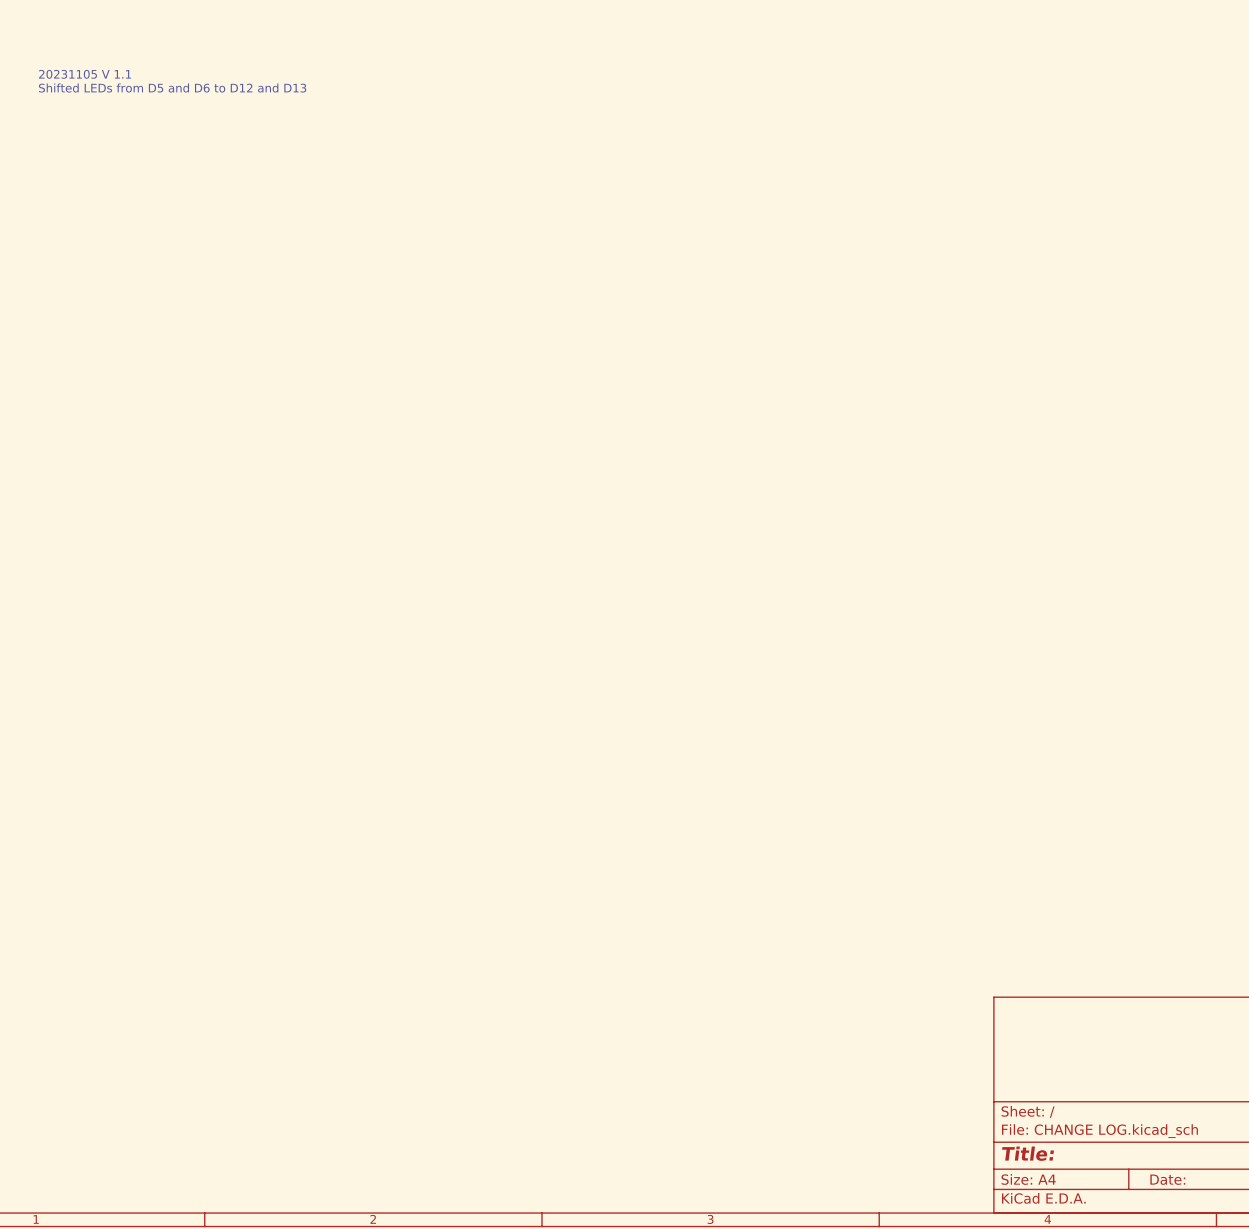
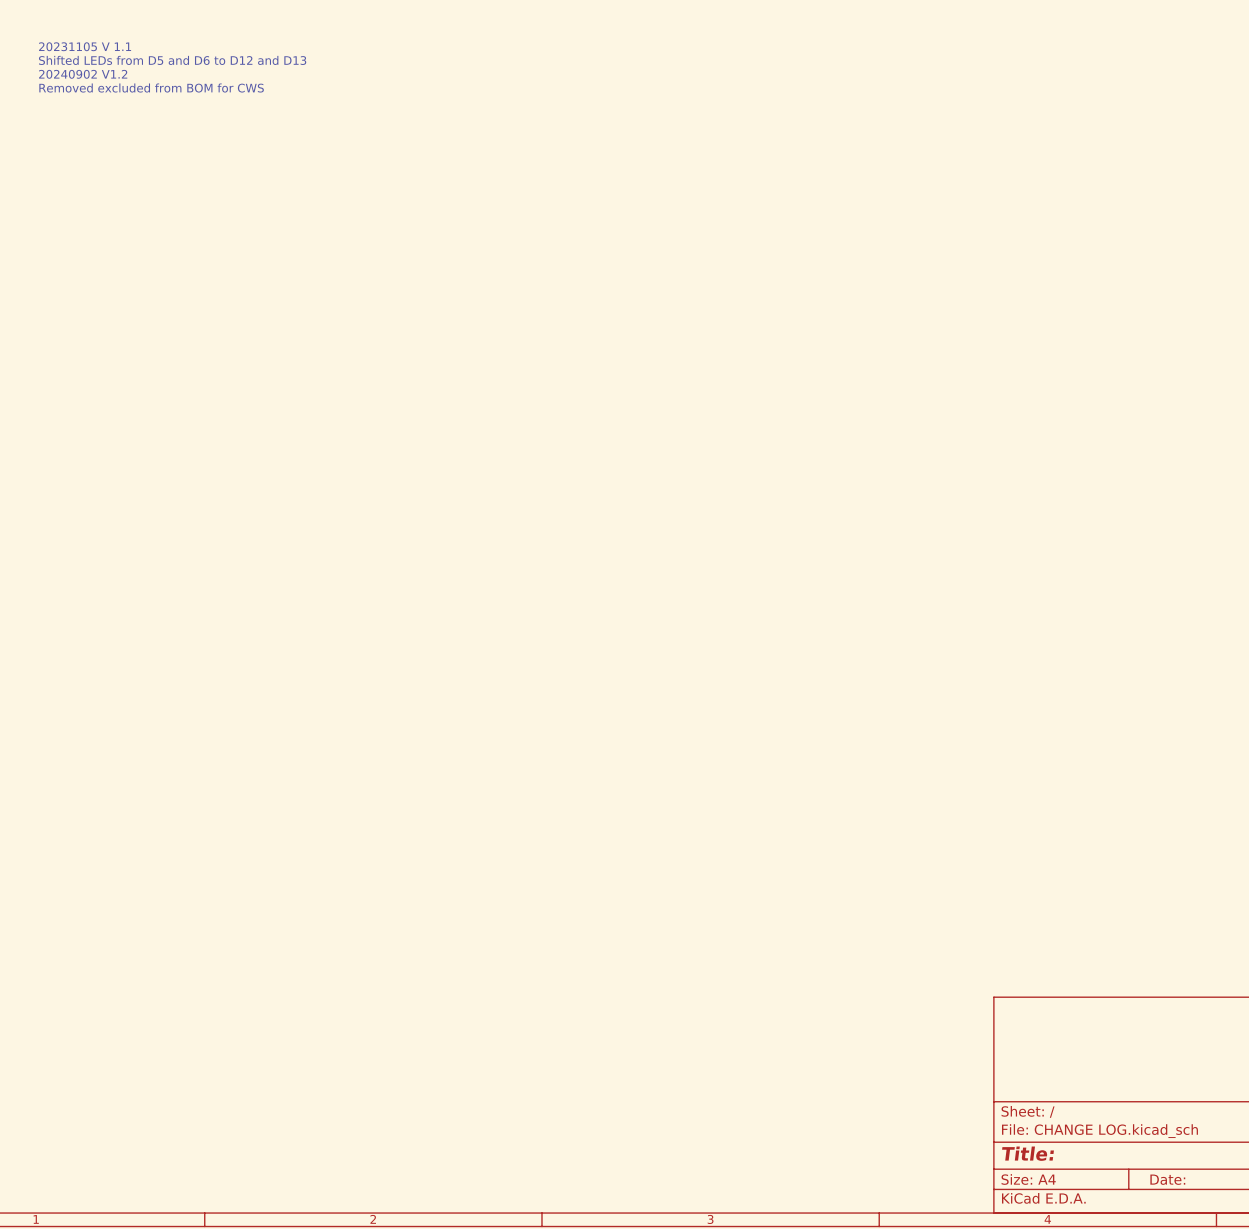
text: none -> 20231105 V 1.1 (85, 46)
text: none -> Shifted LEDs from D5 and D6 to D12 and D13 (172, 60)
text: 20231105 V 1.1 (85, 74) -> 20240902 V1.2 (83, 74)
text: Shifted LEDs from D5 and D6 to D12 and D13 (172, 88) -> Removed excluded from BOM for CWS (151, 88)

